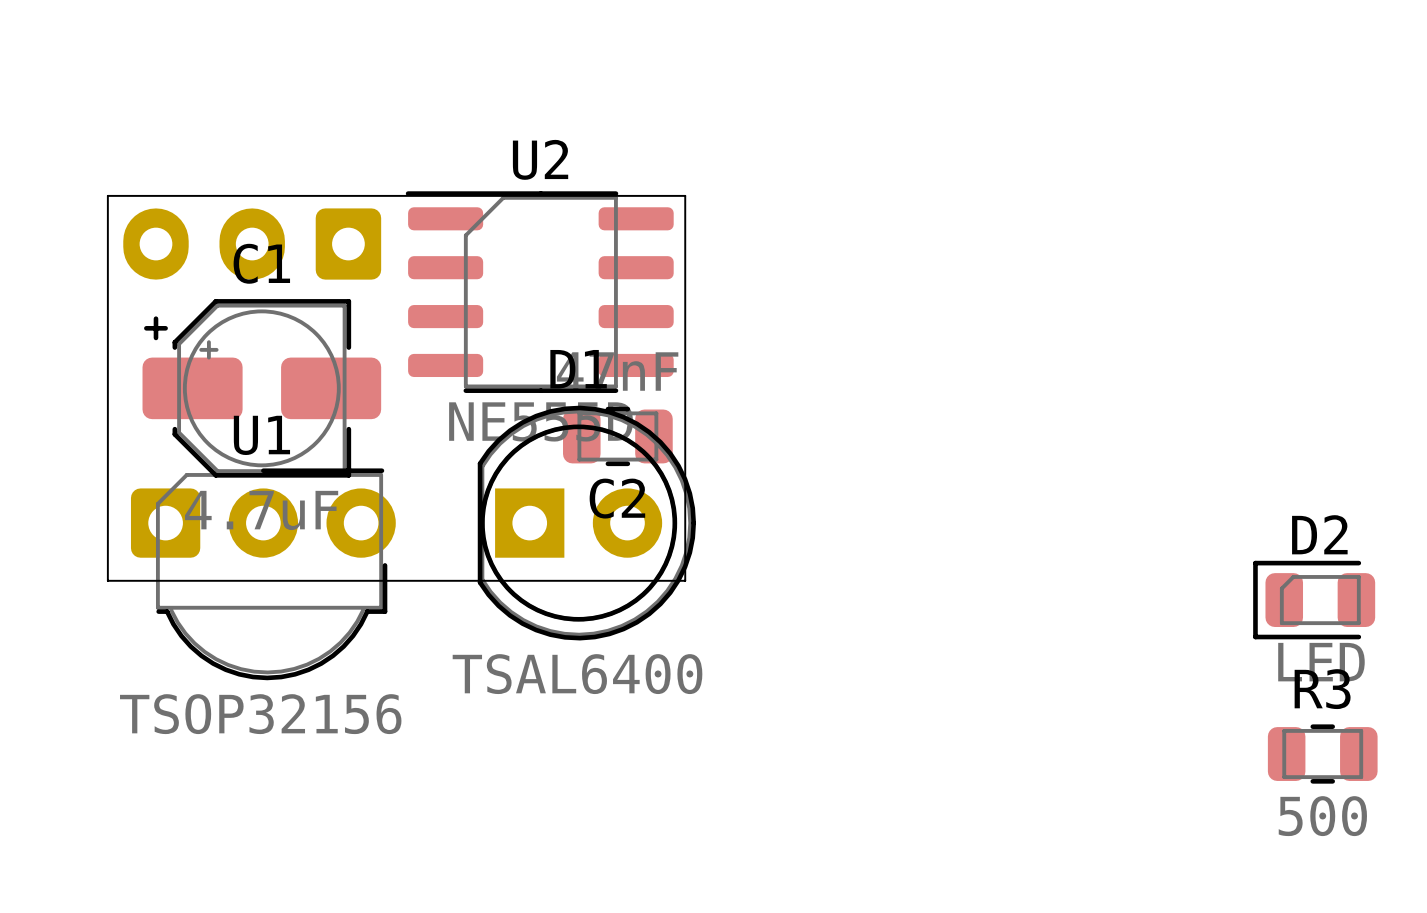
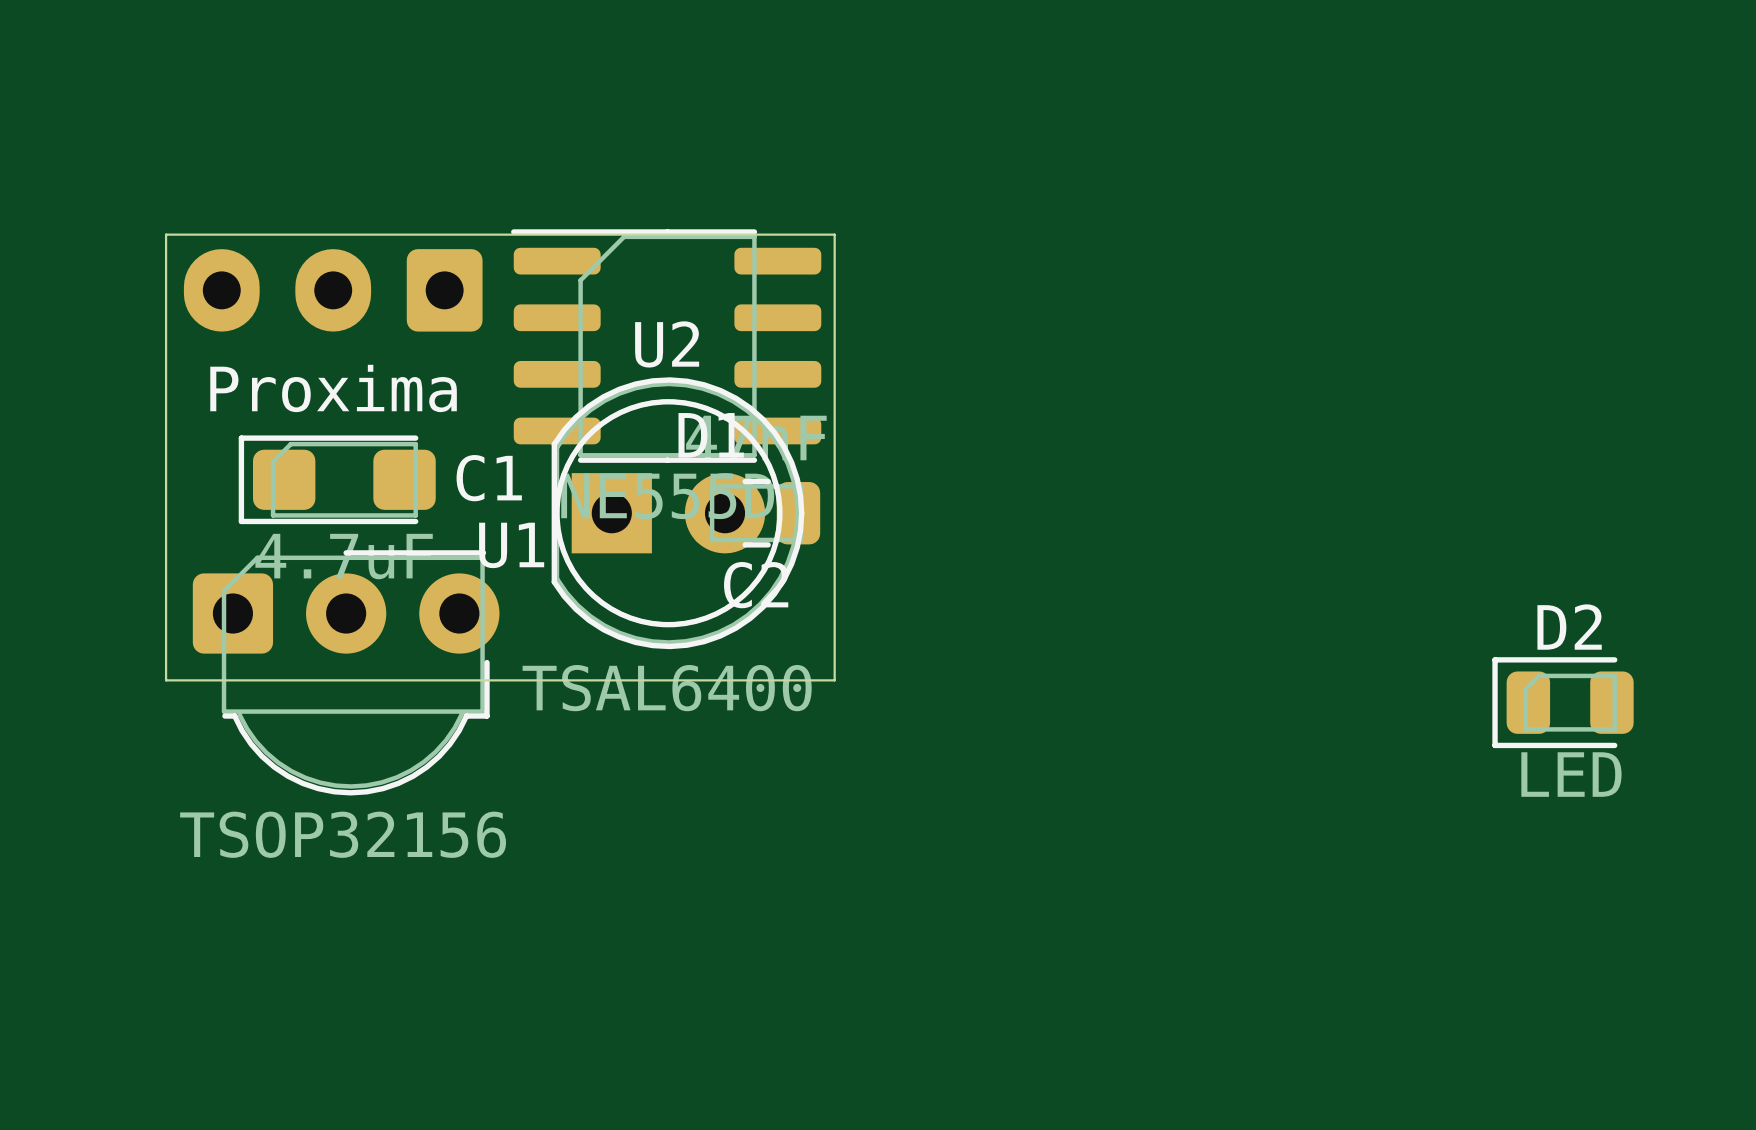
U2 name position: U2 (540, 159) -> U2 (667, 344)
C1 name position: C1 (261, 263) -> C1 (489, 478)
C1 footprint: [142, 299, 382, 478] -> [238, 435, 436, 525]
text: none -> Proxima (333, 388)
U1 name position: U1 (261, 435) -> U1 (511, 545)
D1 position: (586, 523) -> (678, 513)
R3: 500 (1322, 754) -> none

